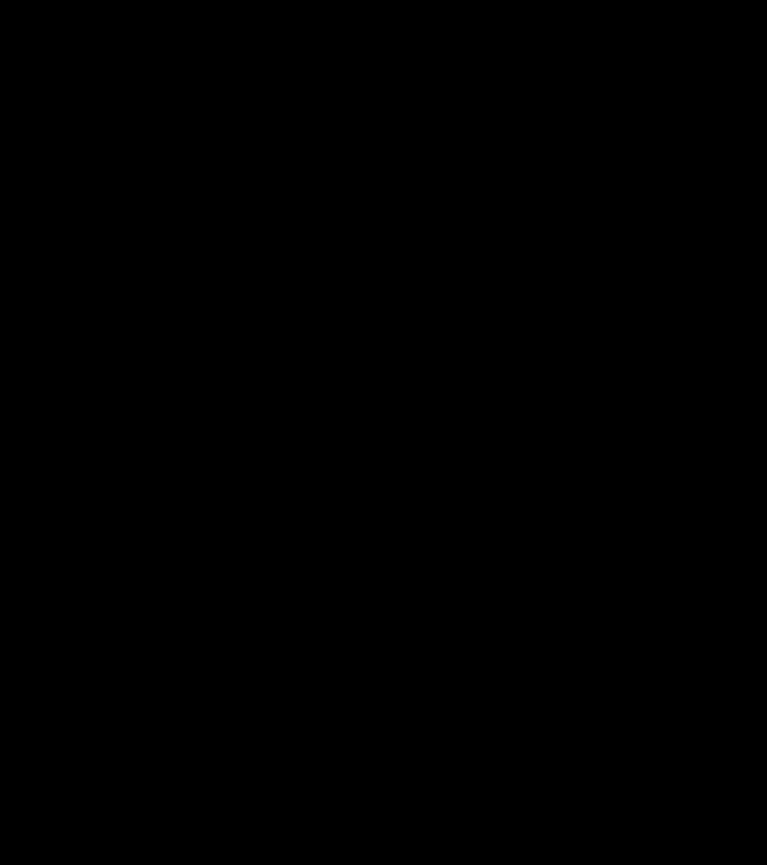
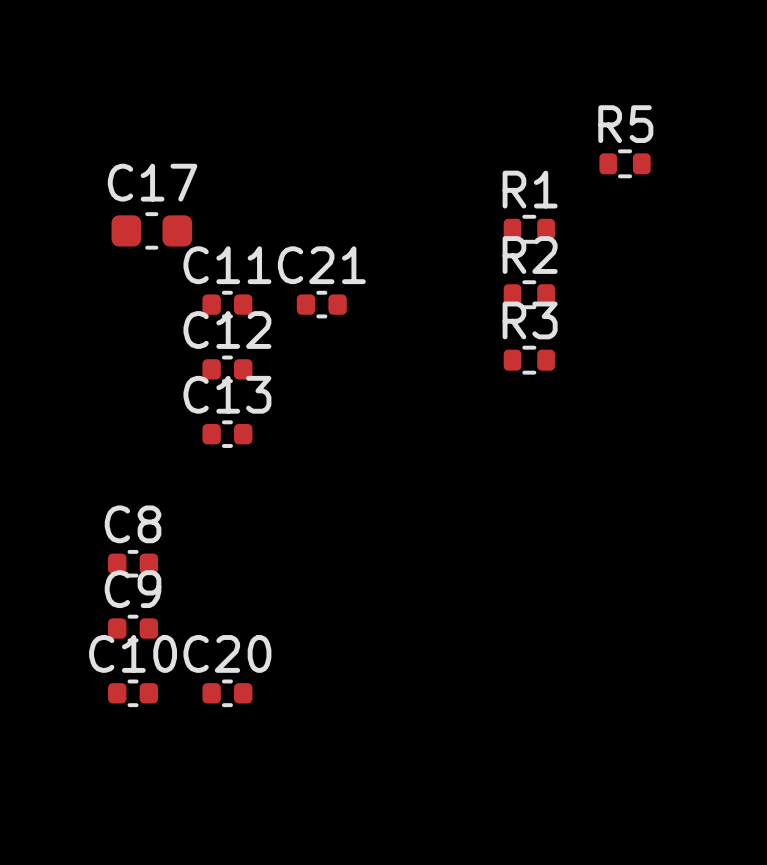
R5: none -> (625, 163)
R1: none -> (529, 229)
C17: none -> (151, 230)
R2: none -> (529, 294)
C11: none -> (227, 304)
C21: none -> (321, 304)
R3: none -> (529, 360)
C12: none -> (227, 369)
C13: none -> (227, 434)
C8: none -> (133, 563)
C9: none -> (133, 628)
C10: none -> (133, 693)
C20: none -> (227, 693)

